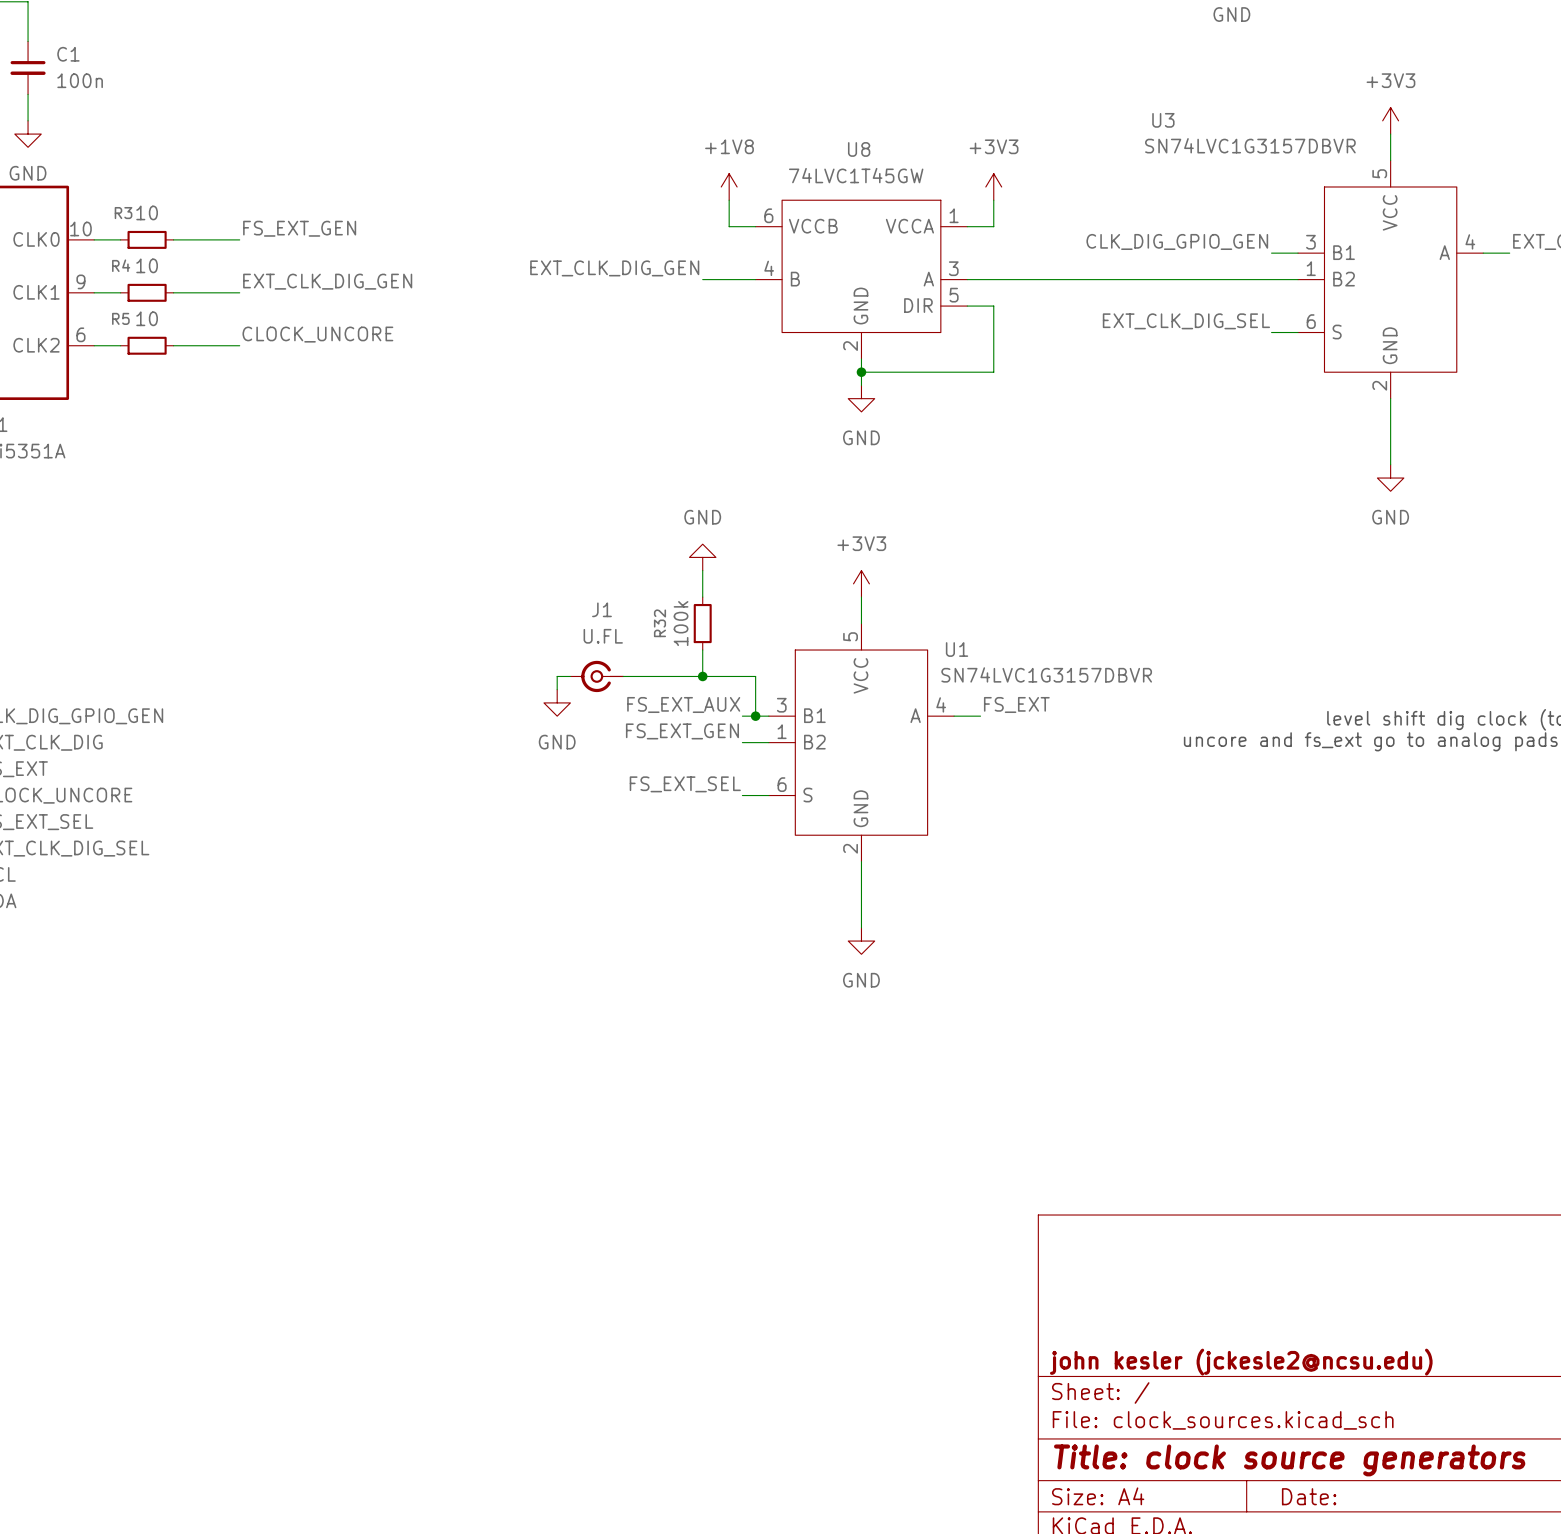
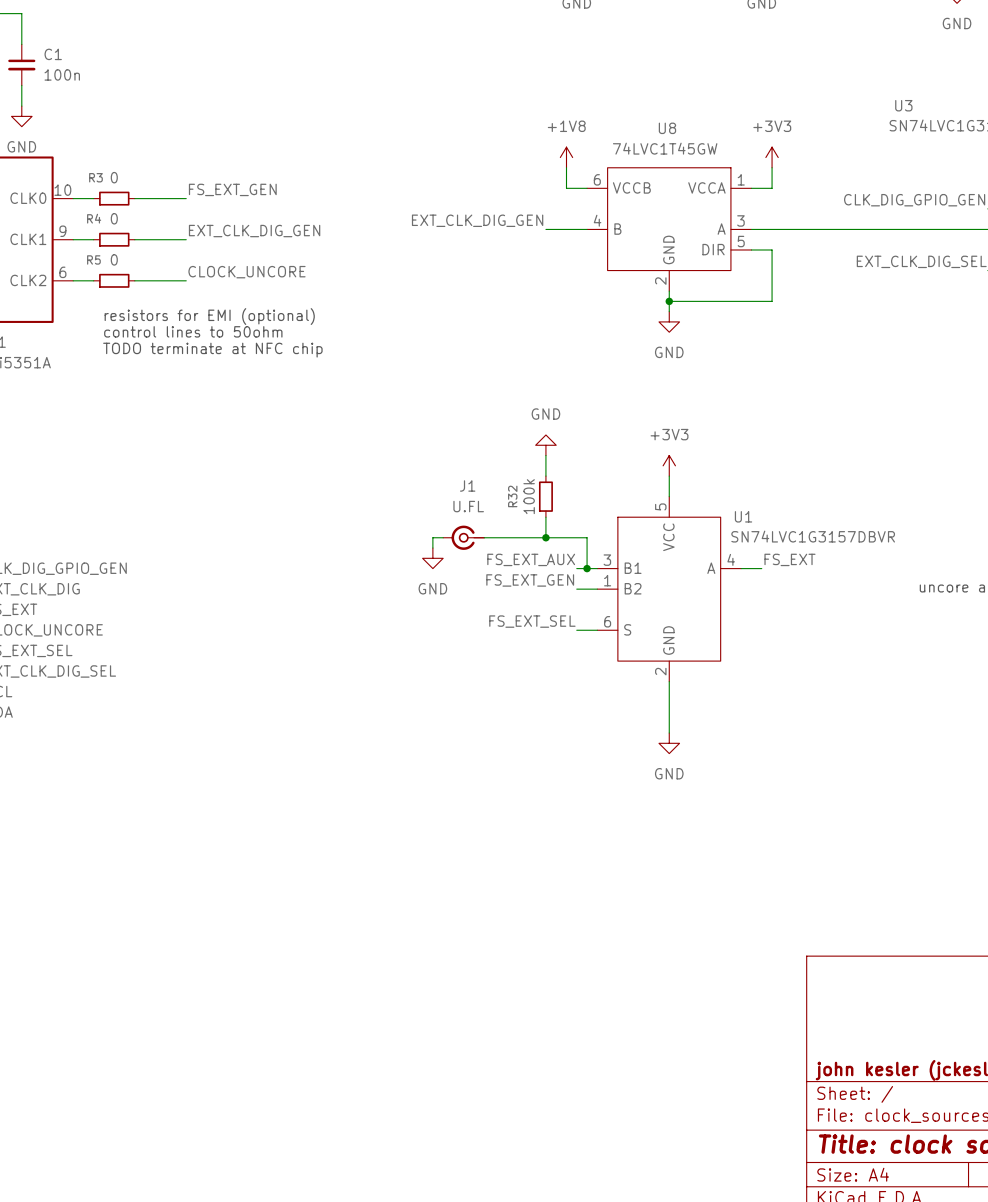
R3 value: 10 (147, 212) -> 0 (114, 177)
R4 value: 10 (147, 265) -> 0 (114, 218)
R5 value: 10 (147, 318) -> 0 (114, 259)
text: none -> resistors for EMI (optional) (209, 316)
text: none -> control lines to 50ohm (193, 331)
text: none -> TODO terminate at NFC chip (212, 350)

